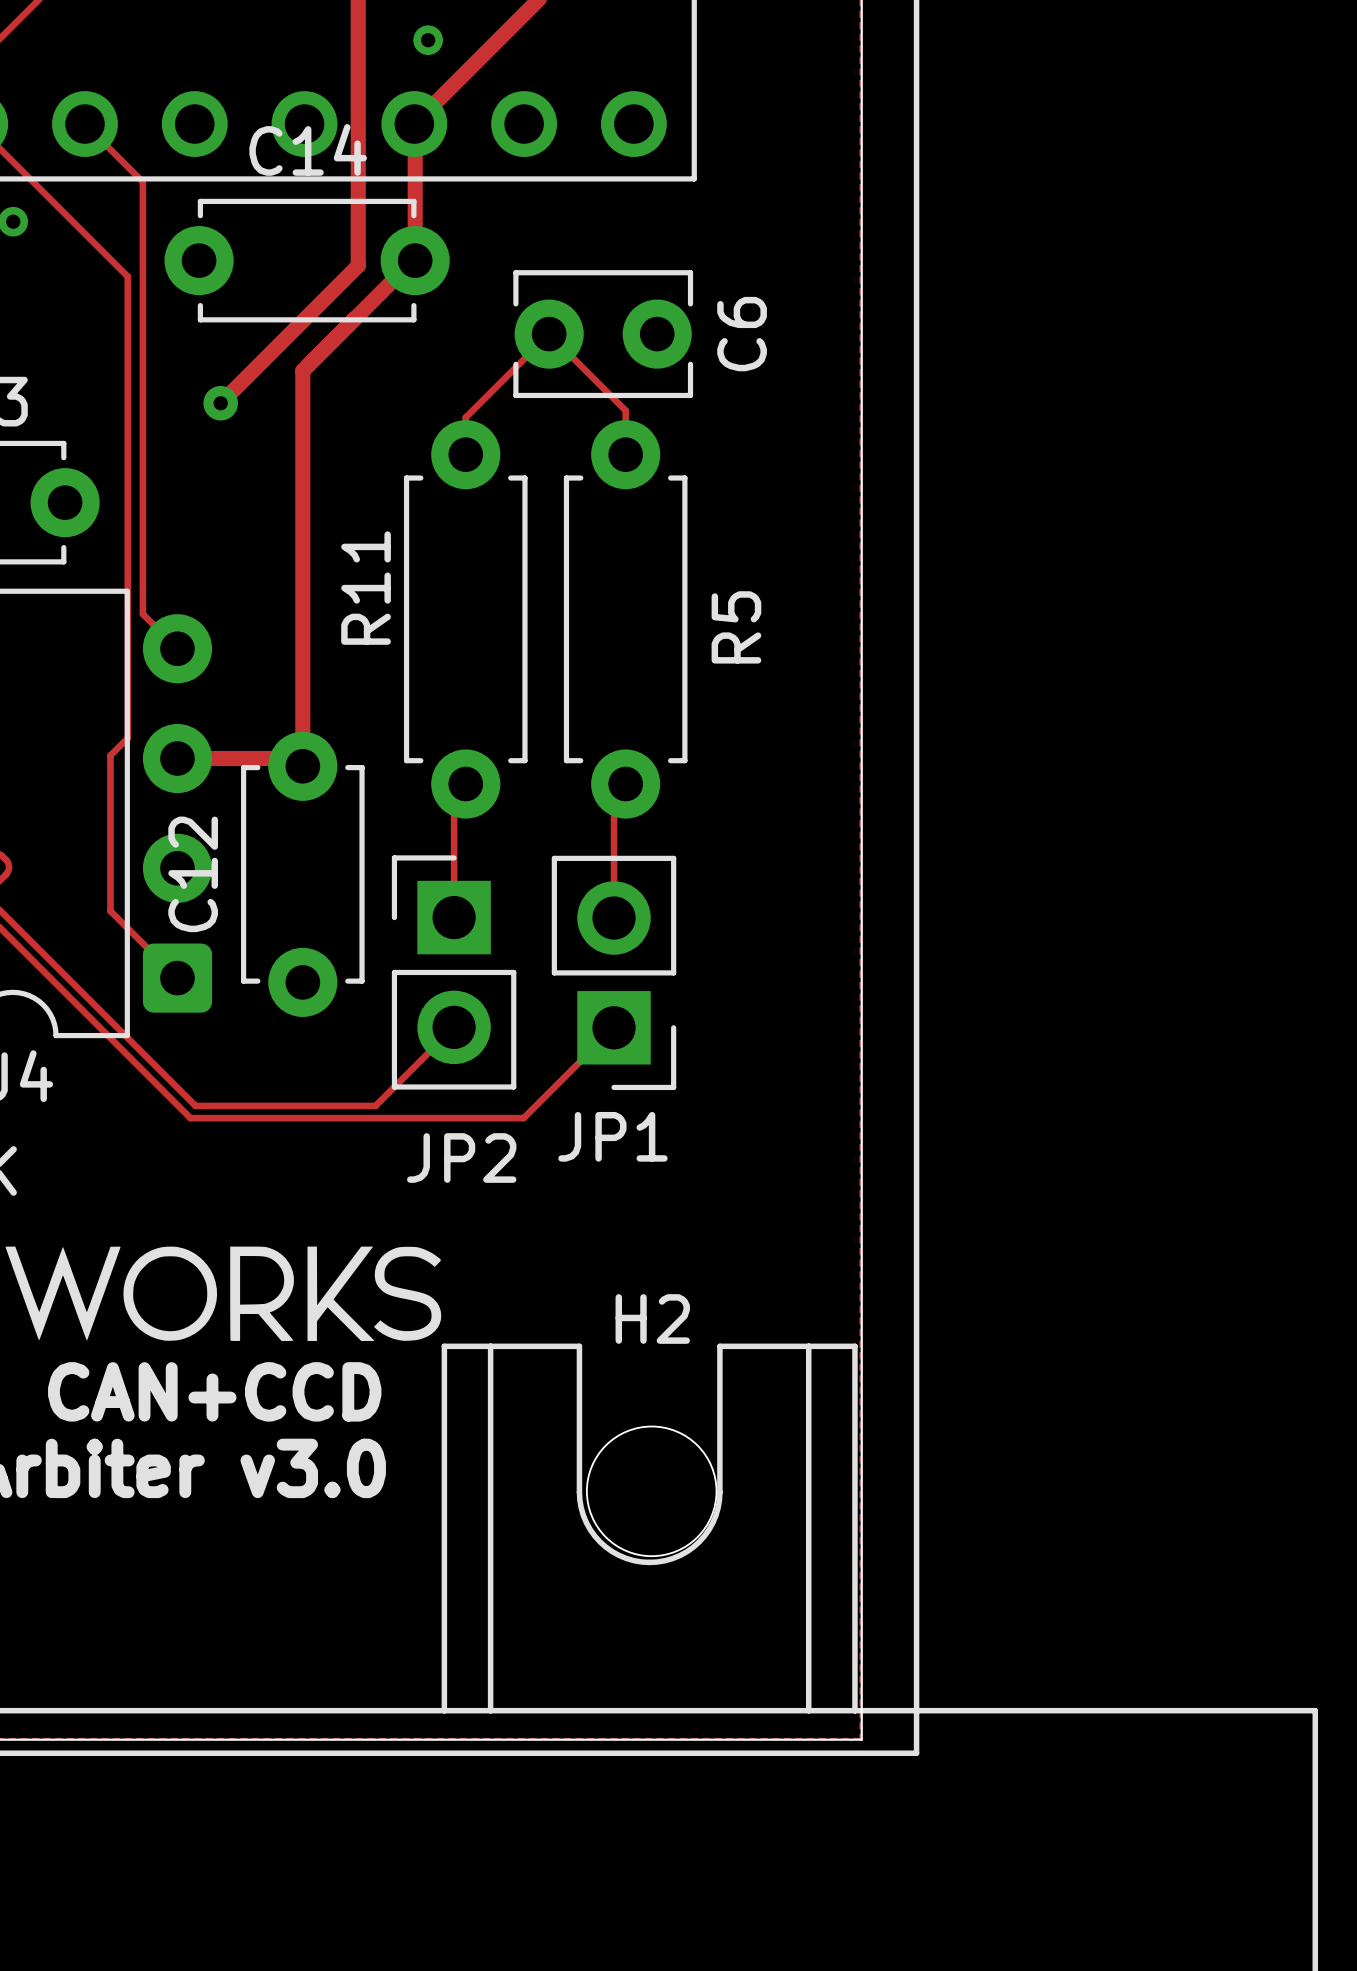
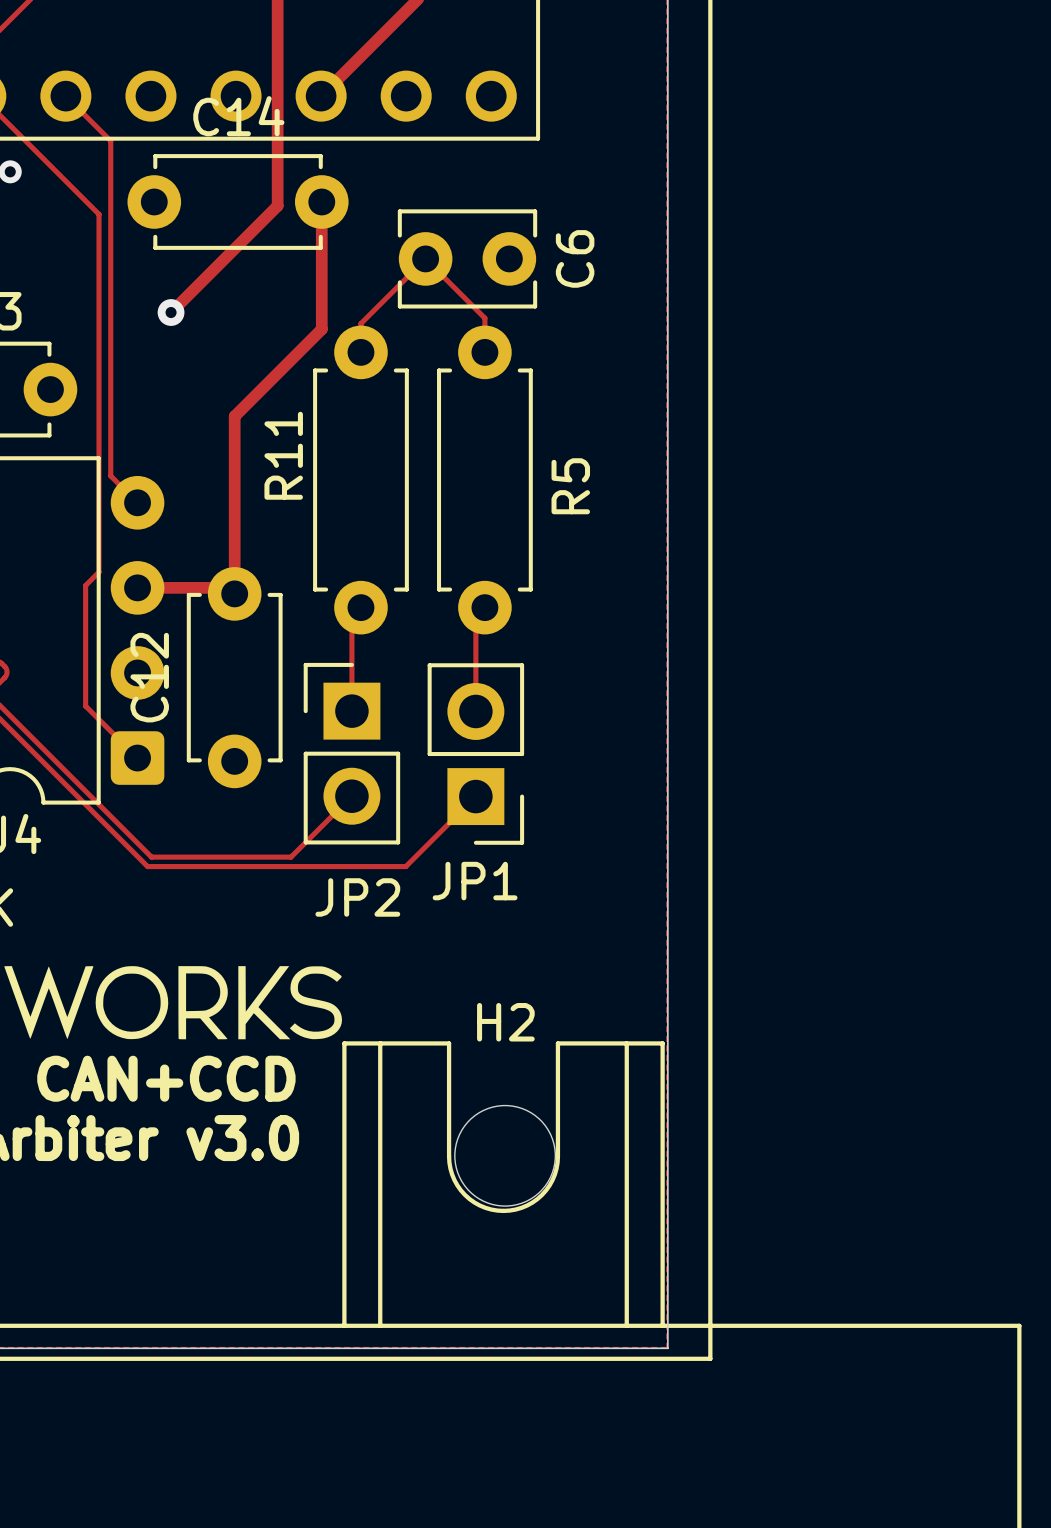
via: (428, 40) -> none
track: (415, 124) (415, 256) -> none
track: (421, 251) (302, 370) (302, 537) -> (321, 201) (321, 329) (234, 416)

